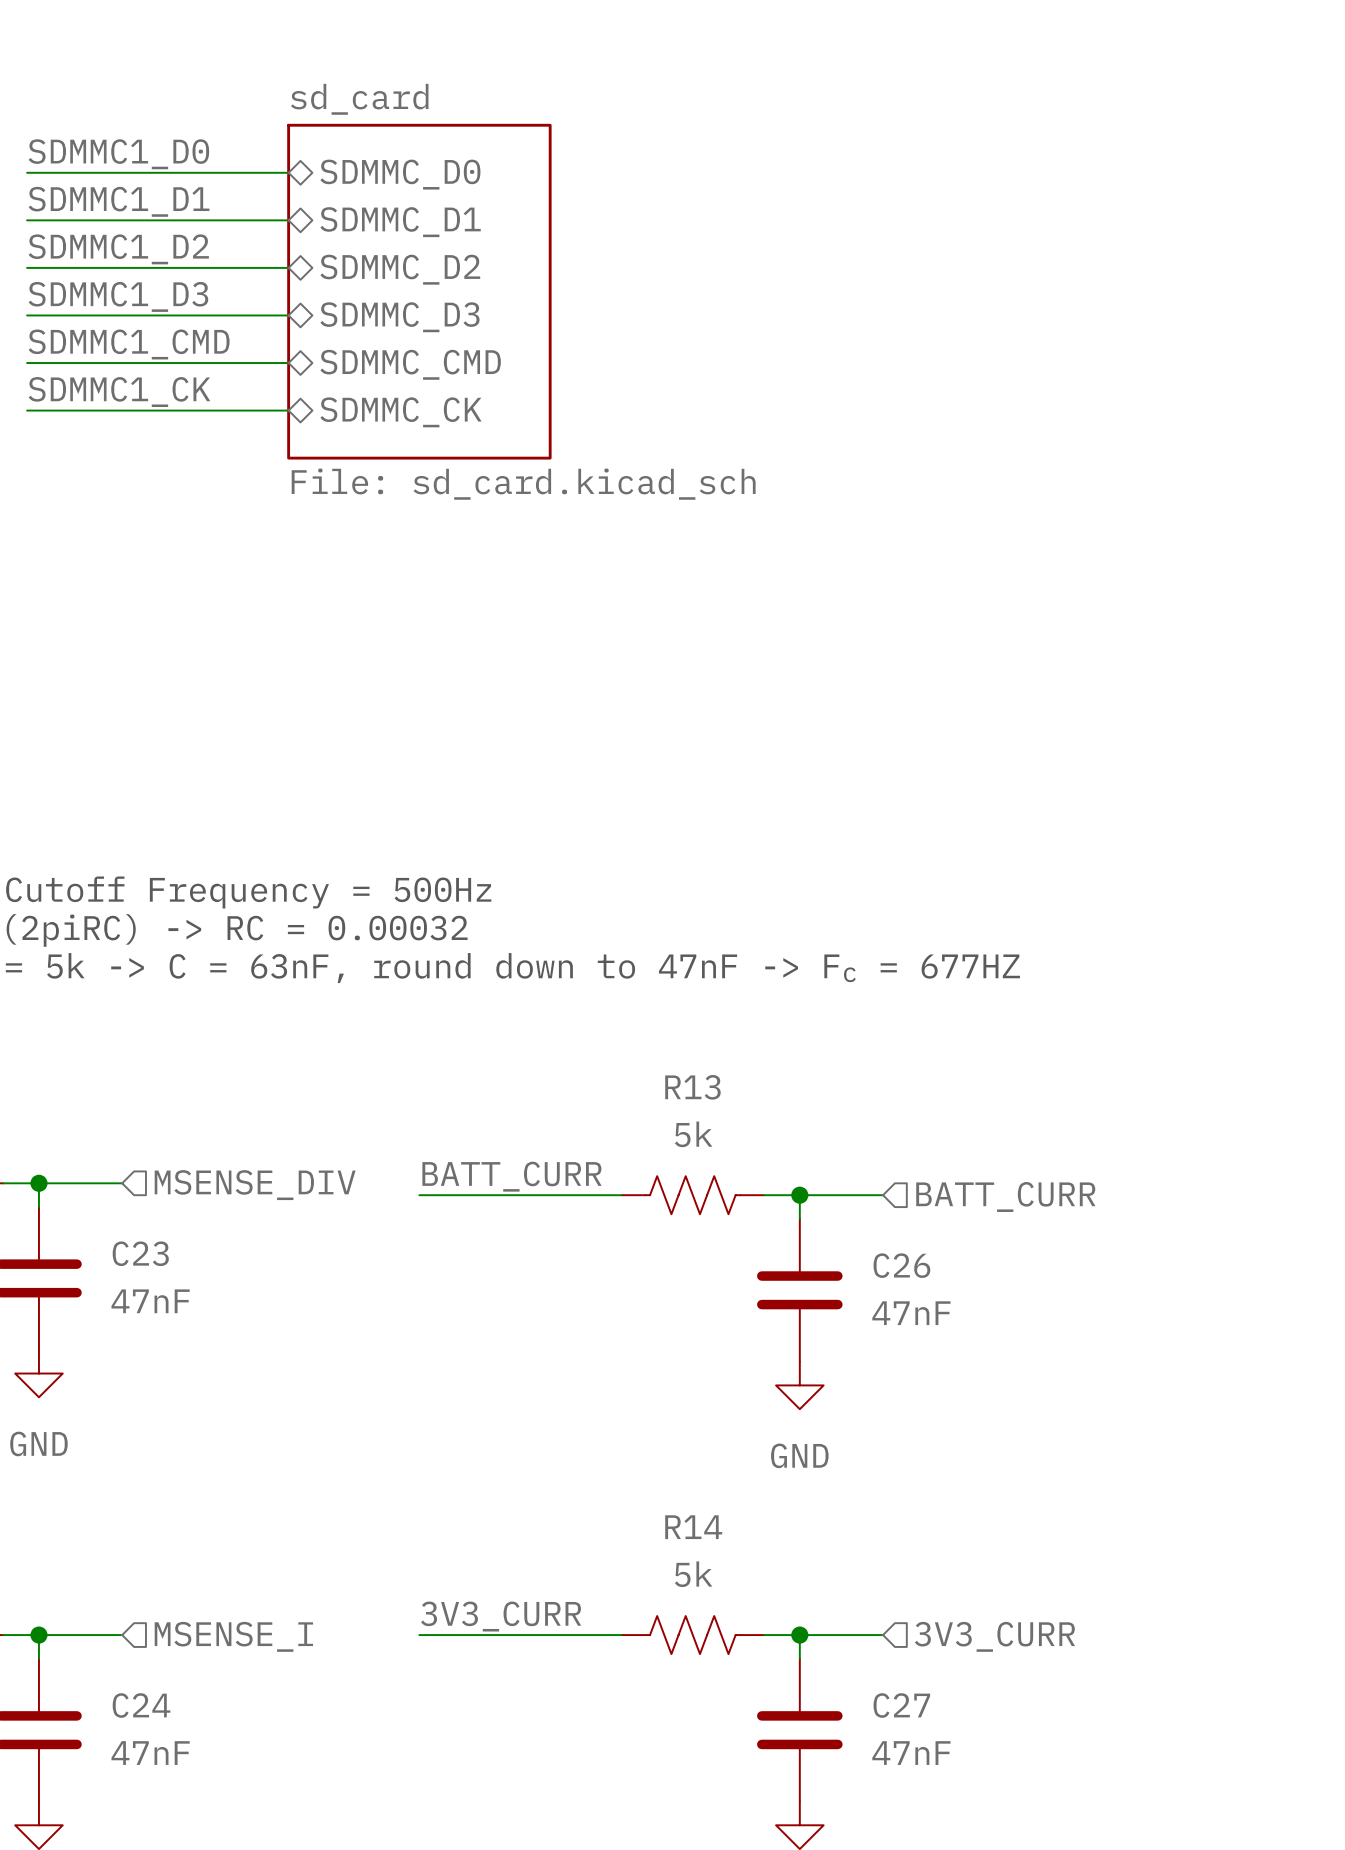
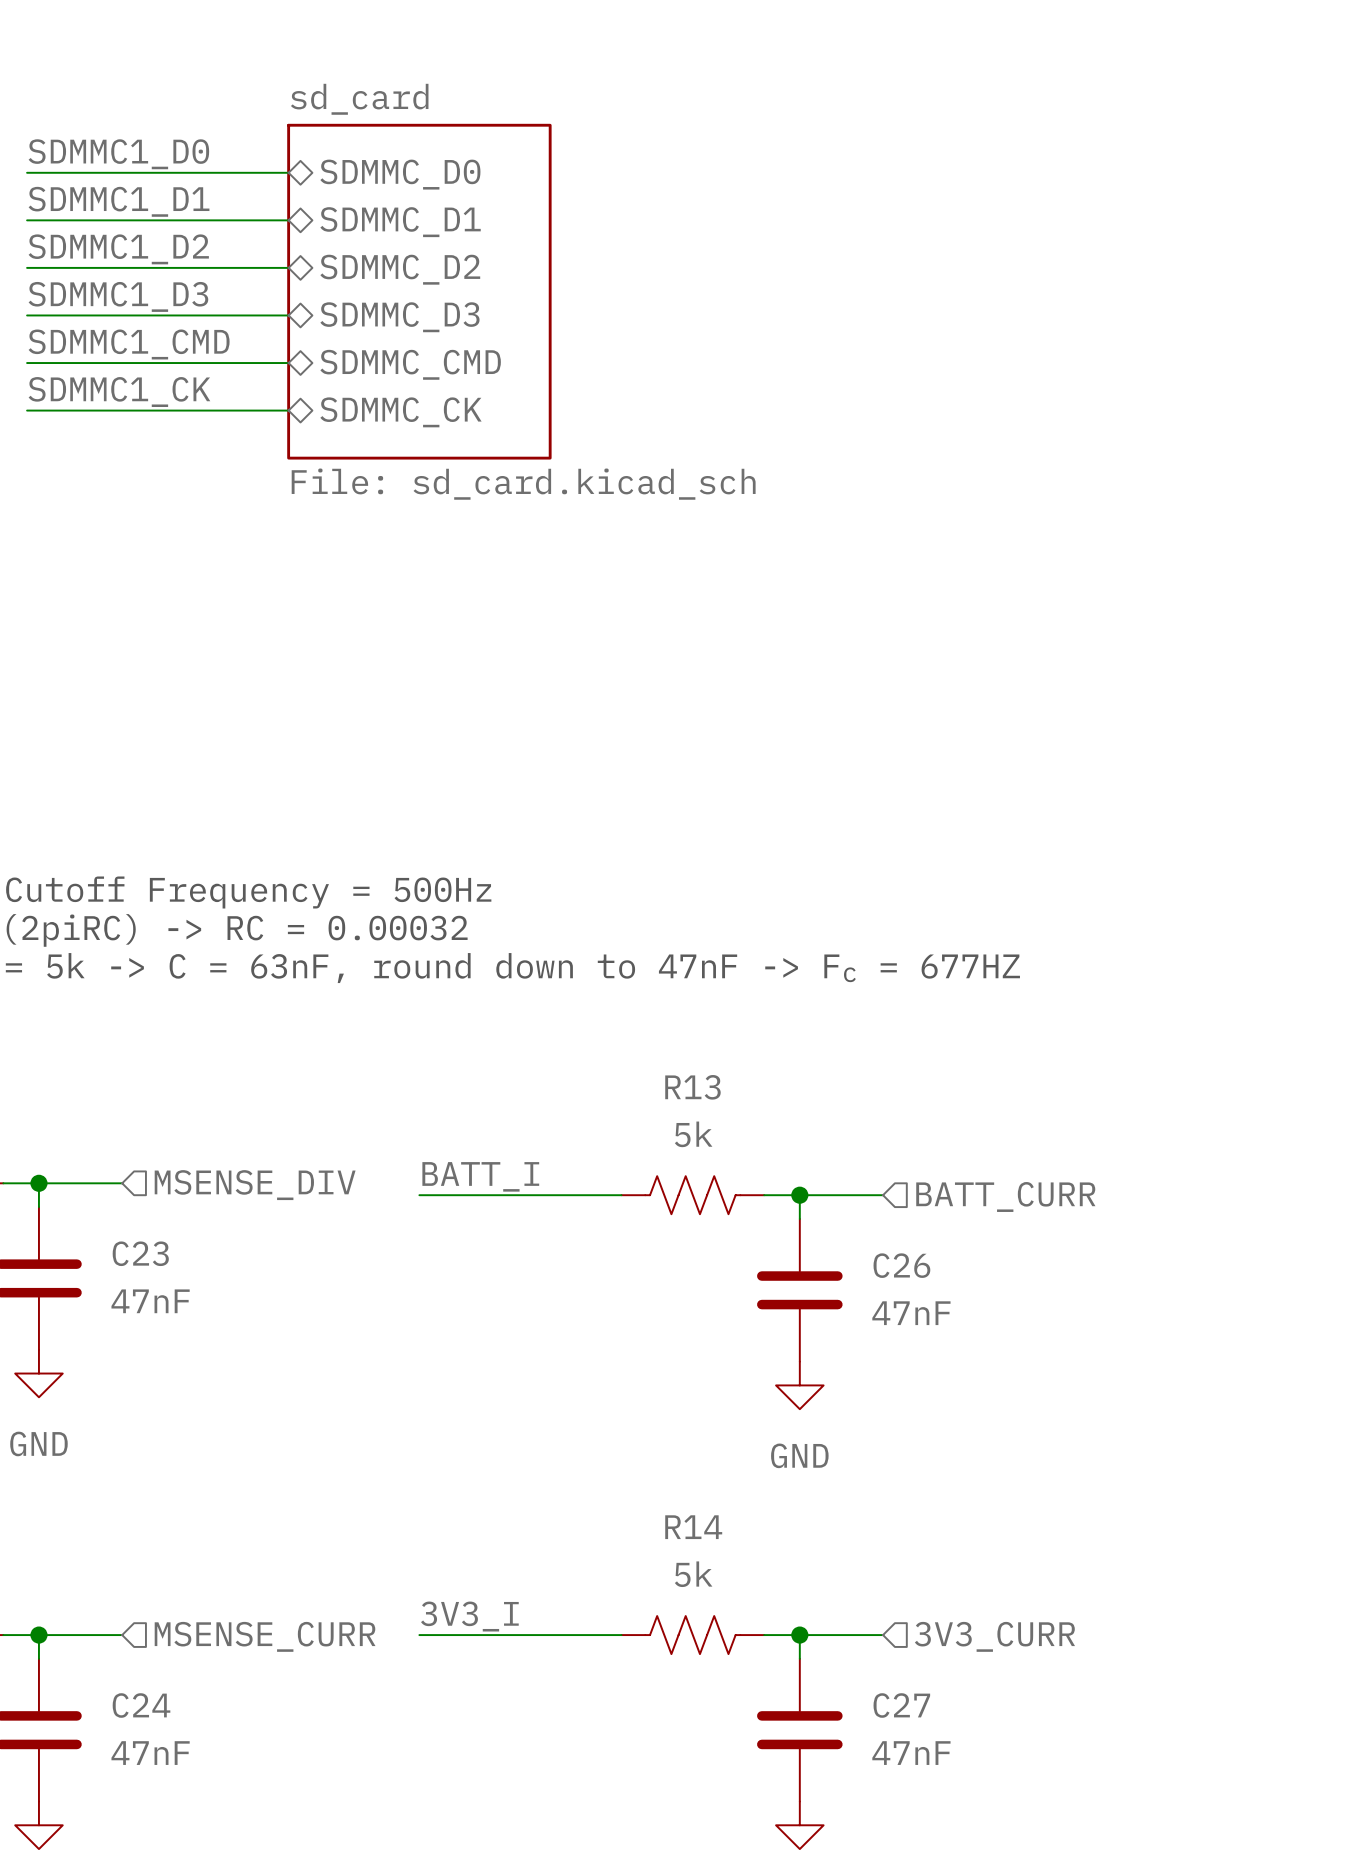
label: BATT_CURR (512, 1176) -> BATT_I (480, 1176)
label: 3V3_CURR (501, 1616) -> 3V3_I (469, 1616)
hierarchical label: MSENSE_I (233, 1636) -> MSENSE_CURR (265, 1636)

